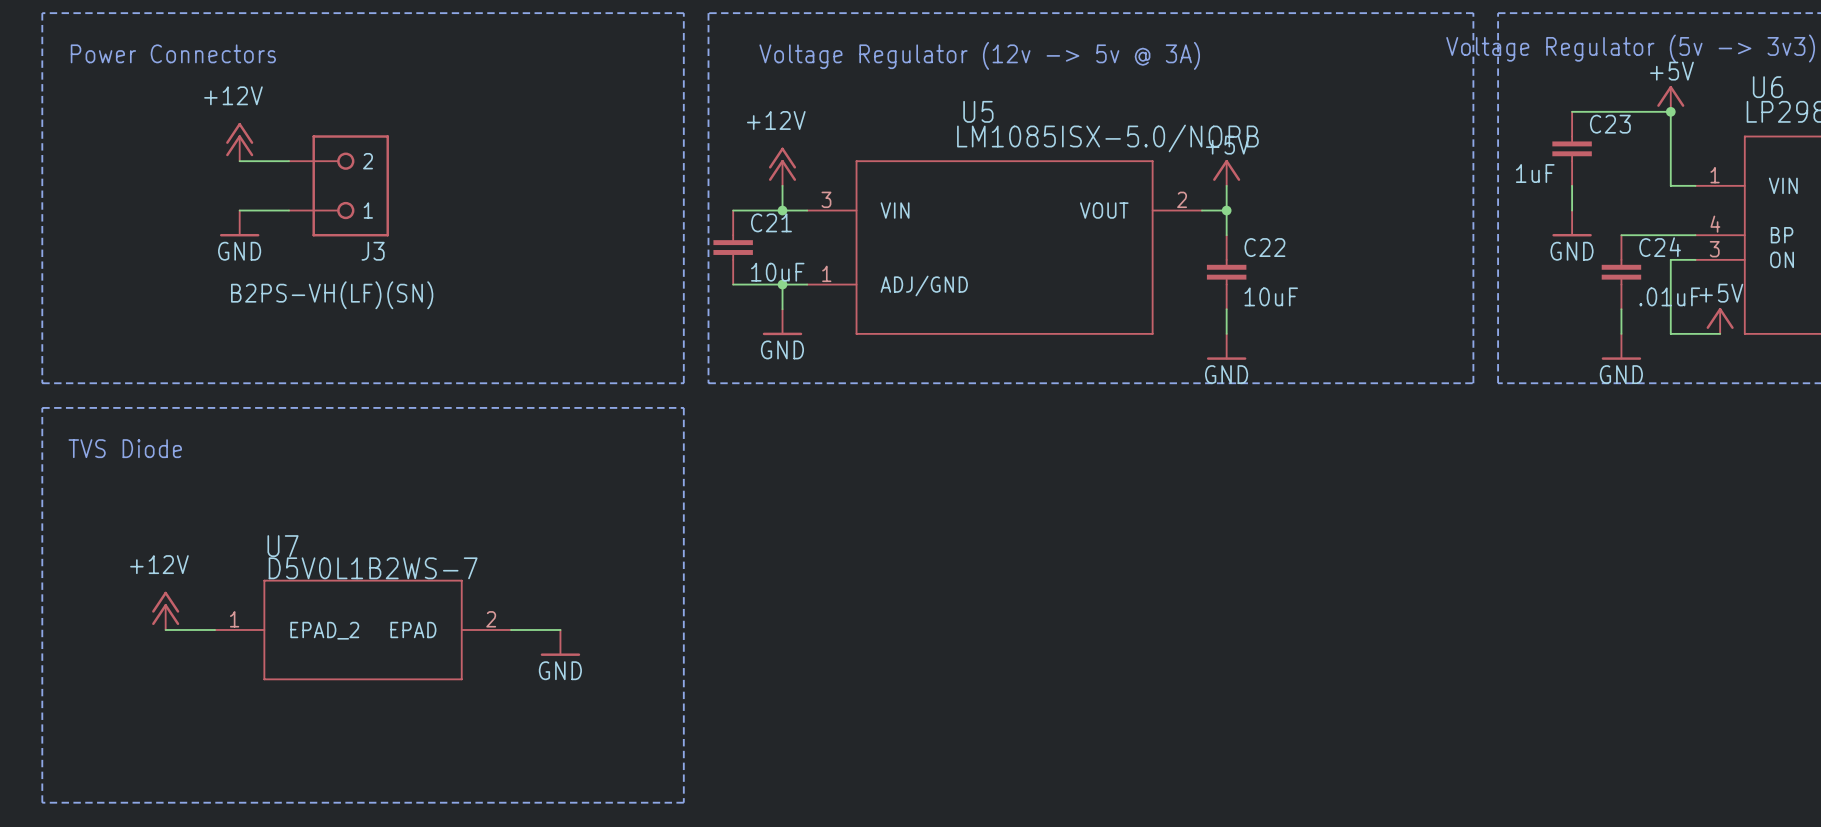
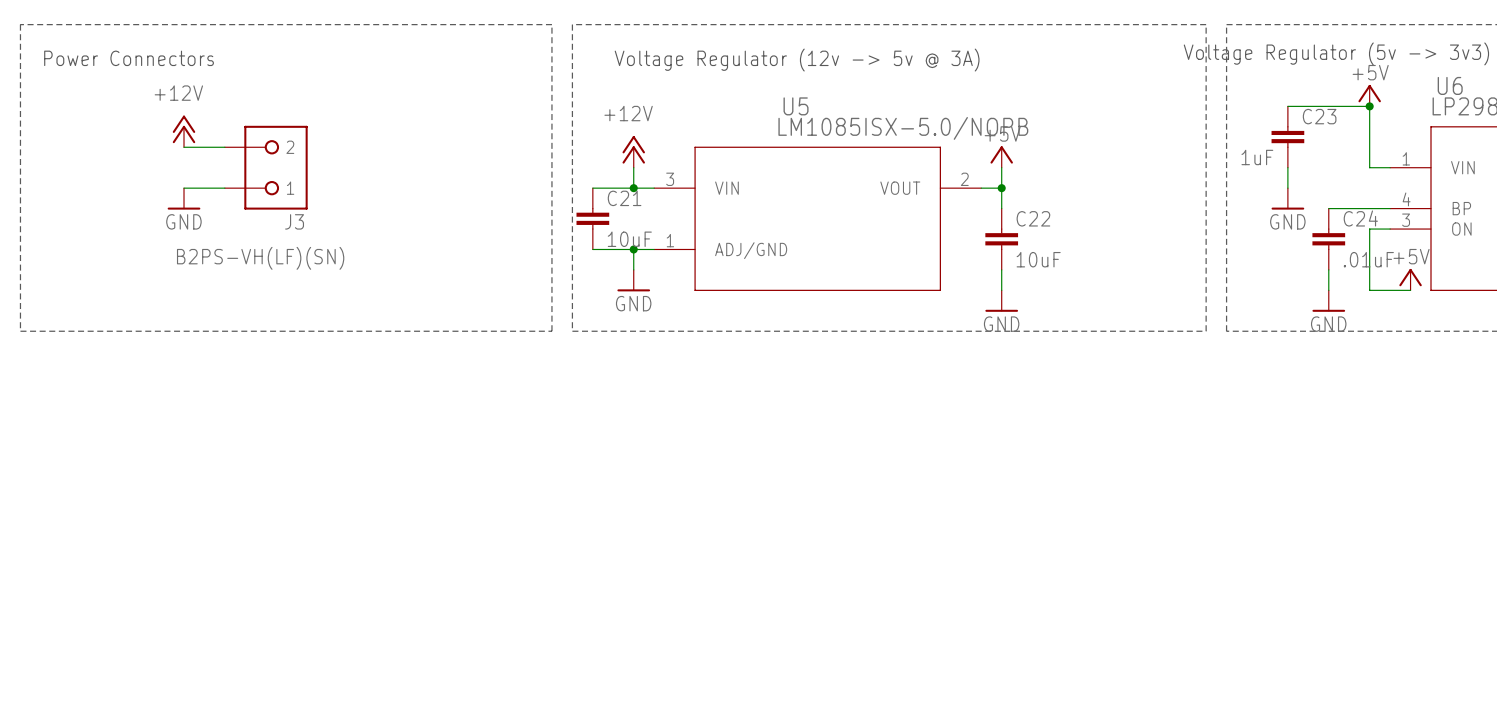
line: (42, 407) (683, 407) (683, 802) (42, 802) (42, 407) -> none
text: TVS Diode (125, 448) -> none
power symbol: +12V (165, 610) -> none
wire: (165, 629) (215, 629) -> none
U7: D5V0L1B2WS-7 (363, 629) -> none
wire: (511, 629) (560, 629) -> none
power symbol: GND (560, 642) -> none

